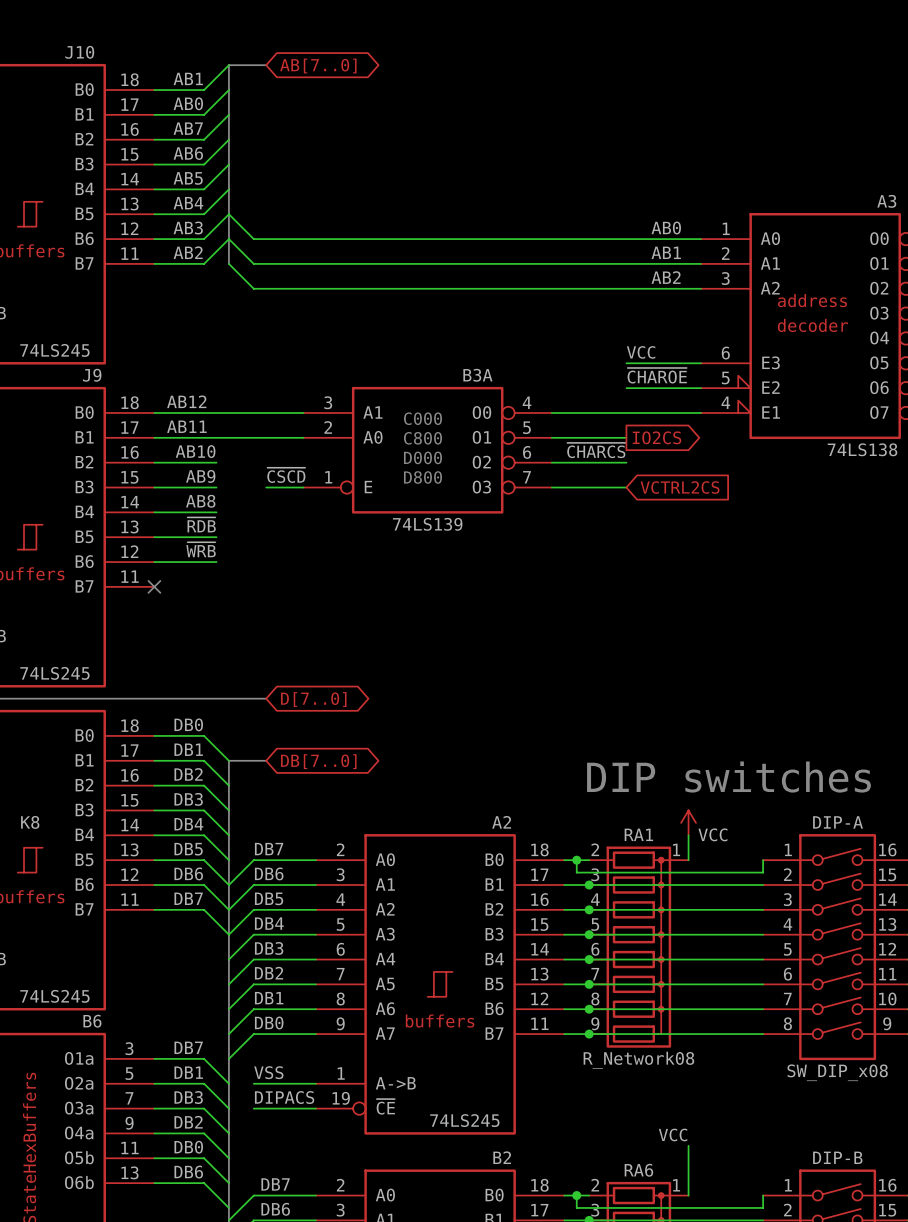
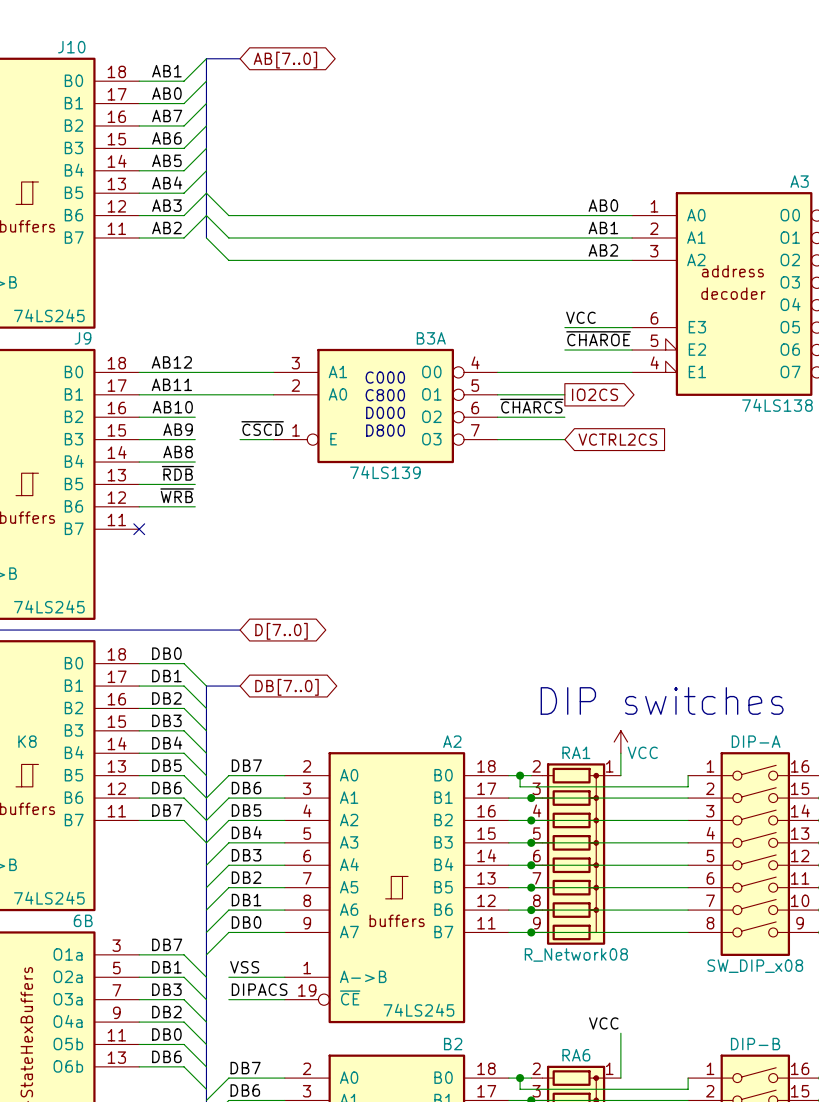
B6 name: B6 (92, 1021) -> 6B (83, 920)

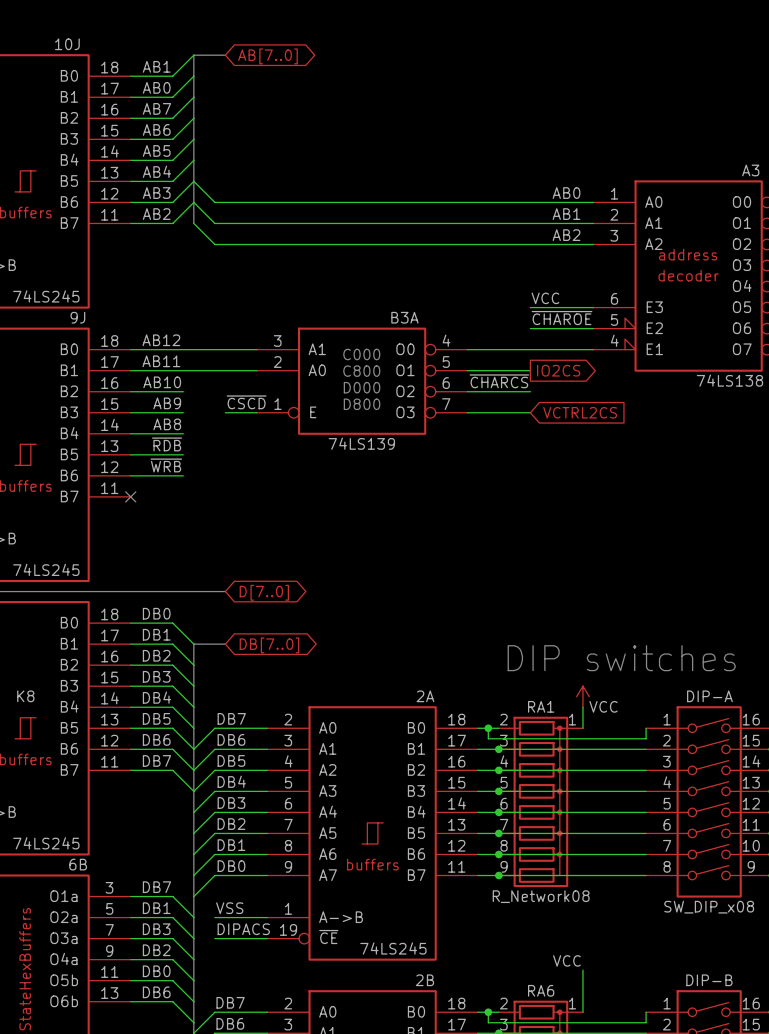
J10 name: J10 (71, 47) -> 10J (67, 44)
J9 name: J9 (82, 338) -> 9J (77, 317)
A2 name: A2 (452, 741) -> 2A (425, 696)
B2 name: B2 (453, 1044) -> 2B (424, 980)

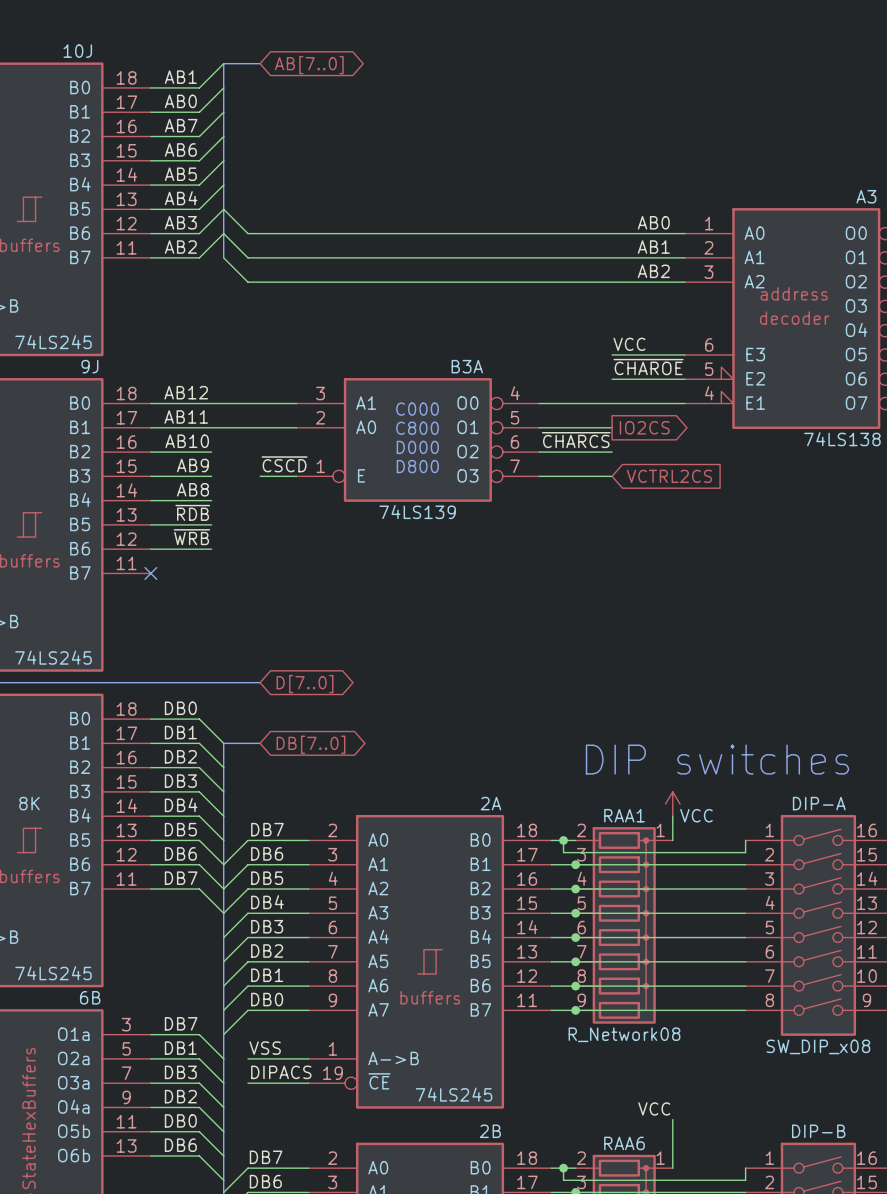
K8 name: K8 (25, 696) -> 8K (29, 803)
RA1 name: RA1 (541, 706) -> RAA1 (624, 815)
RA6 name: RA6 (541, 990) -> RAA6 (624, 1143)

